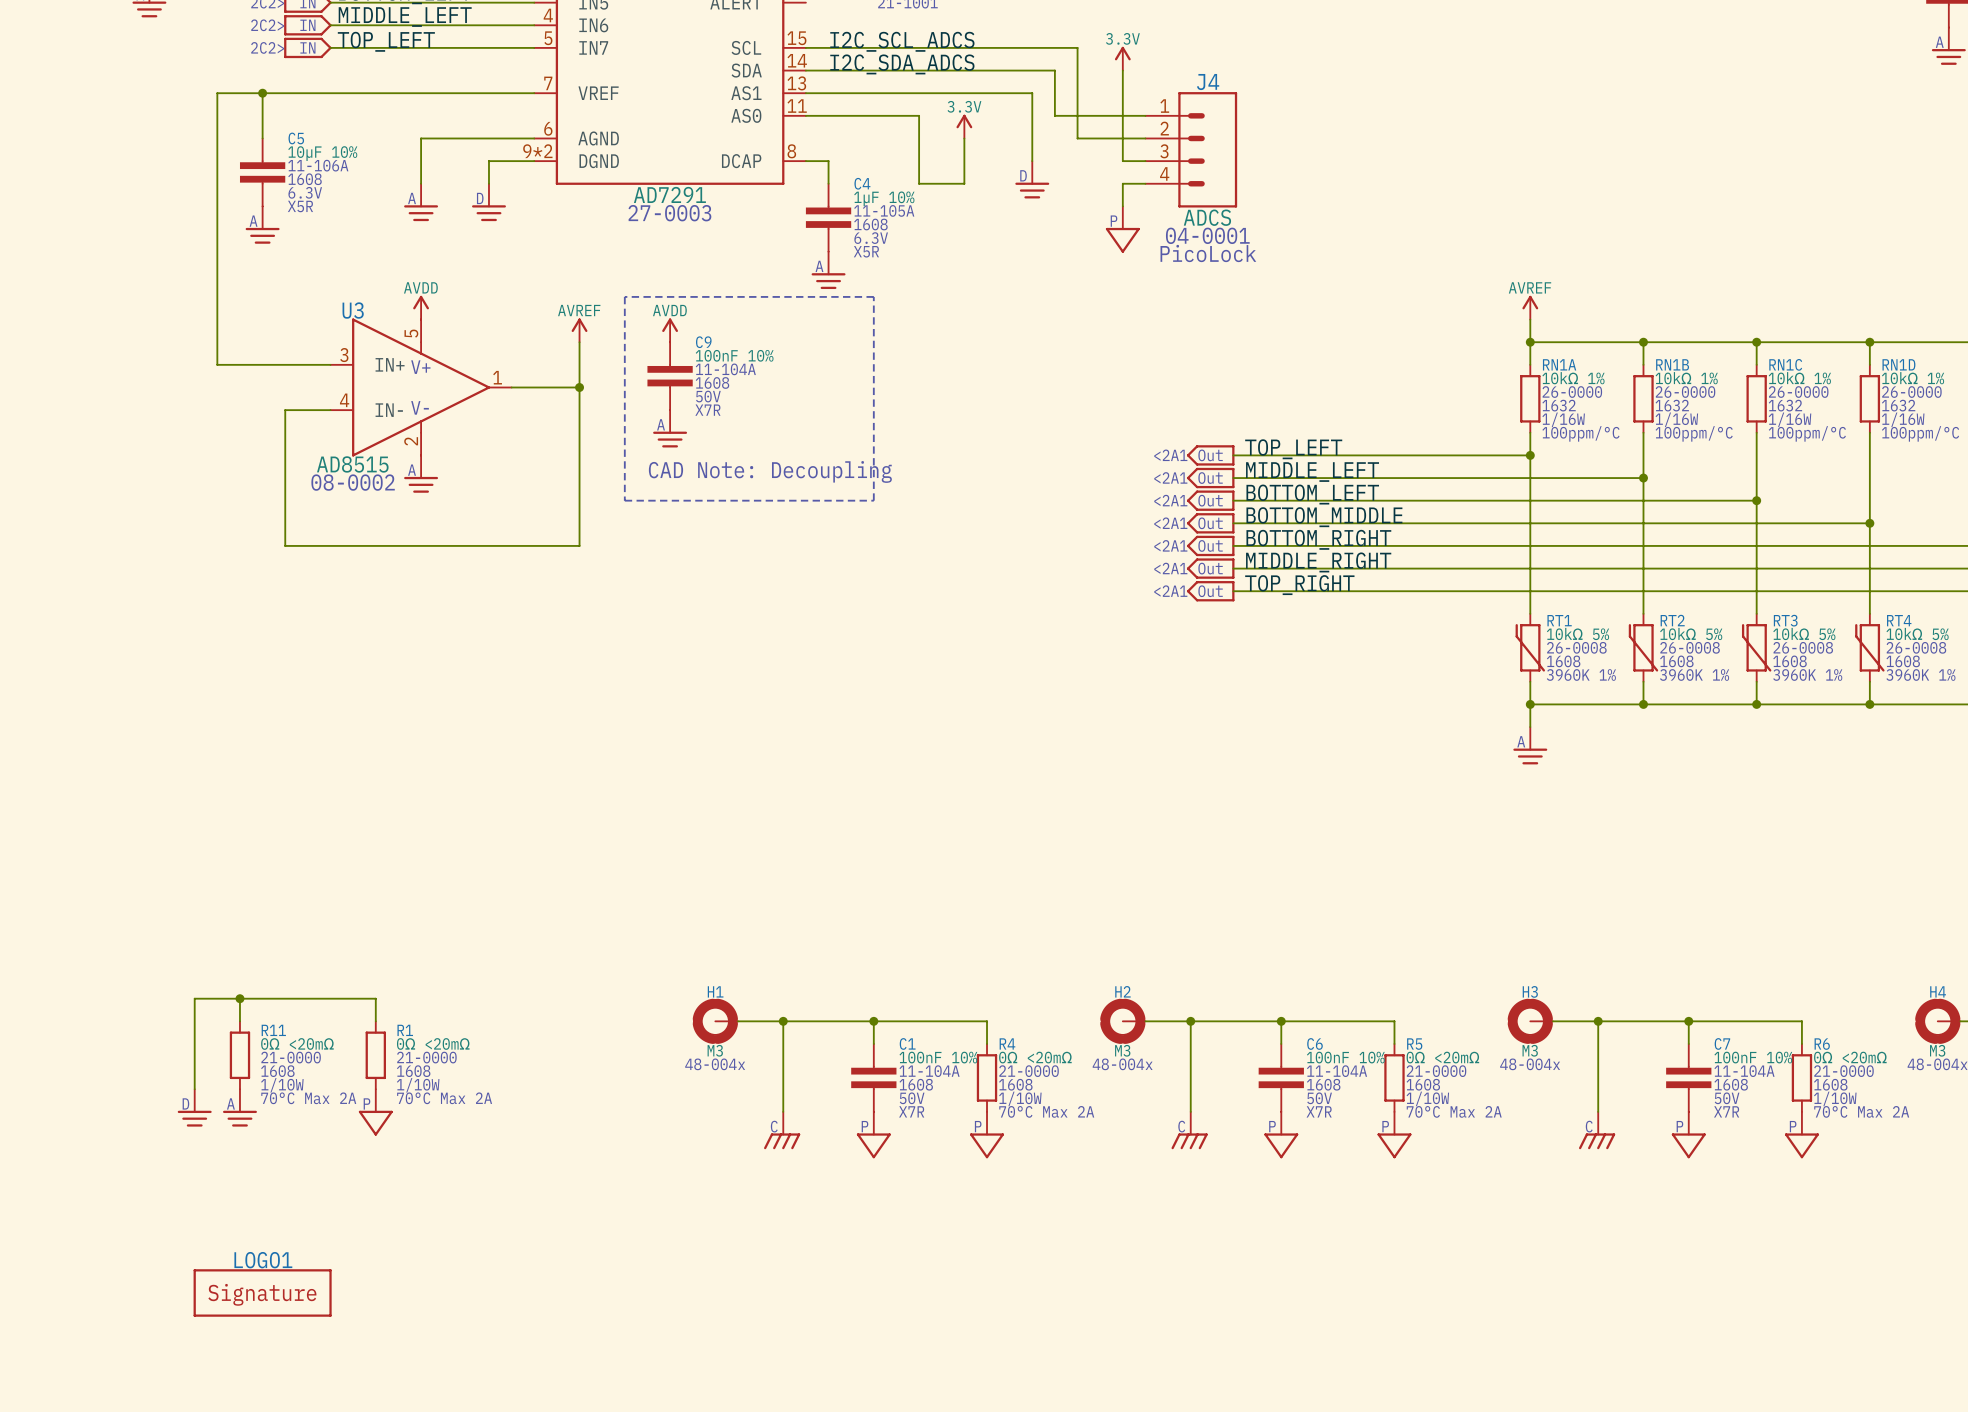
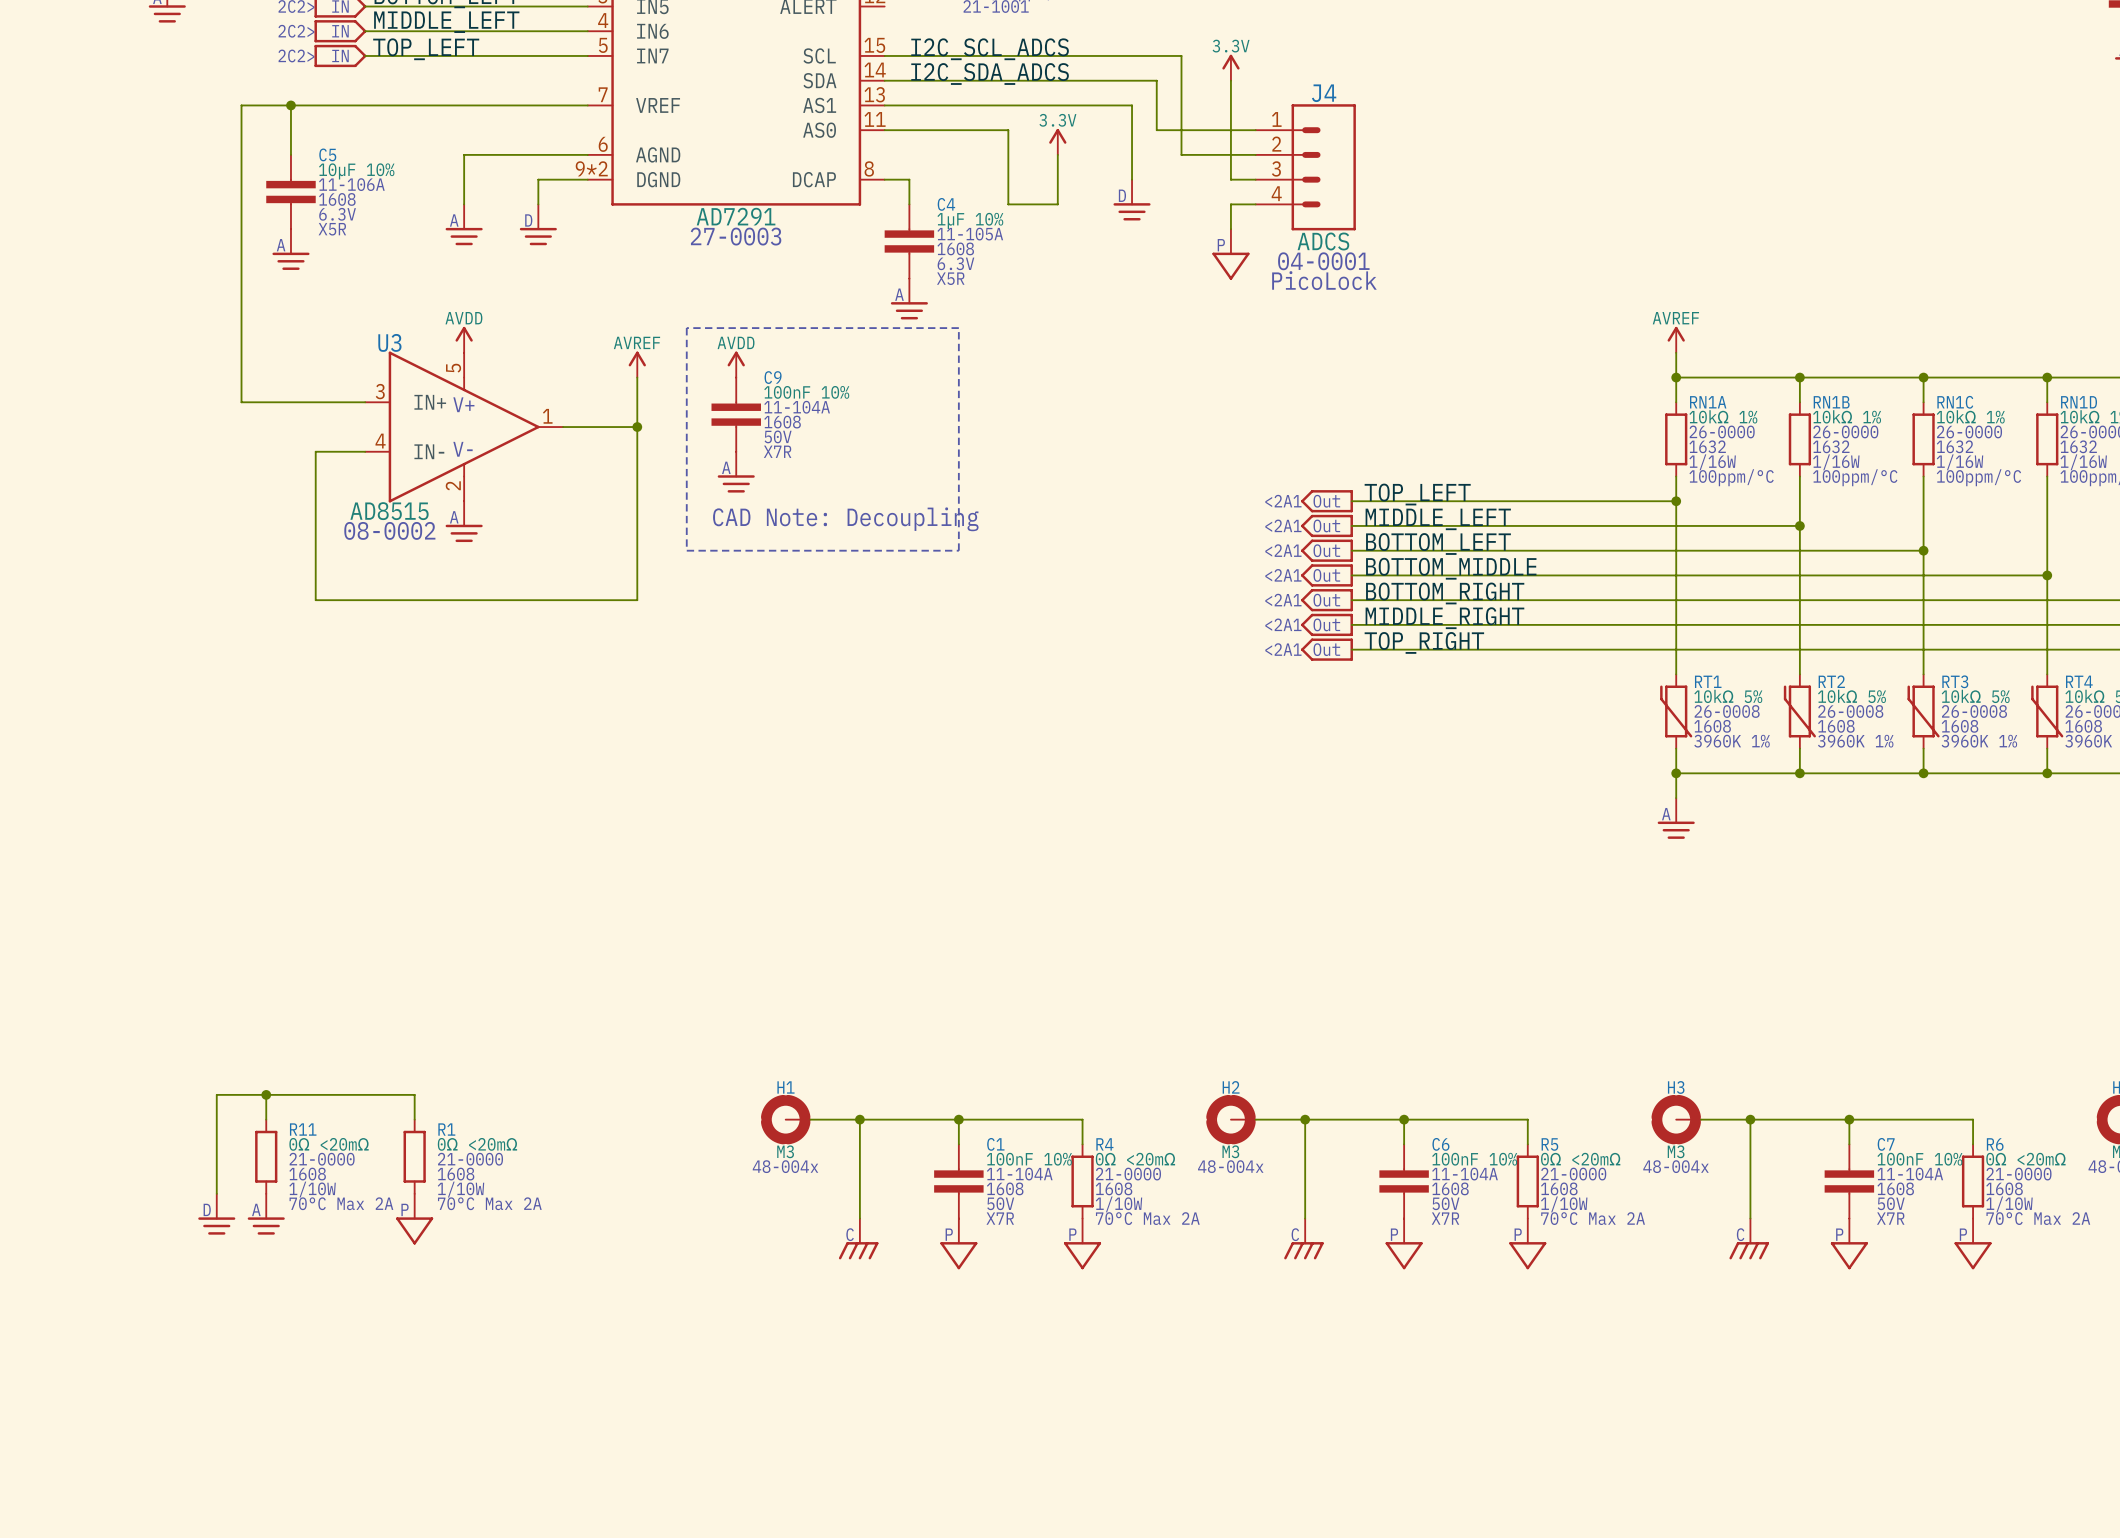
LOGO1: (262, 1292) -> none

